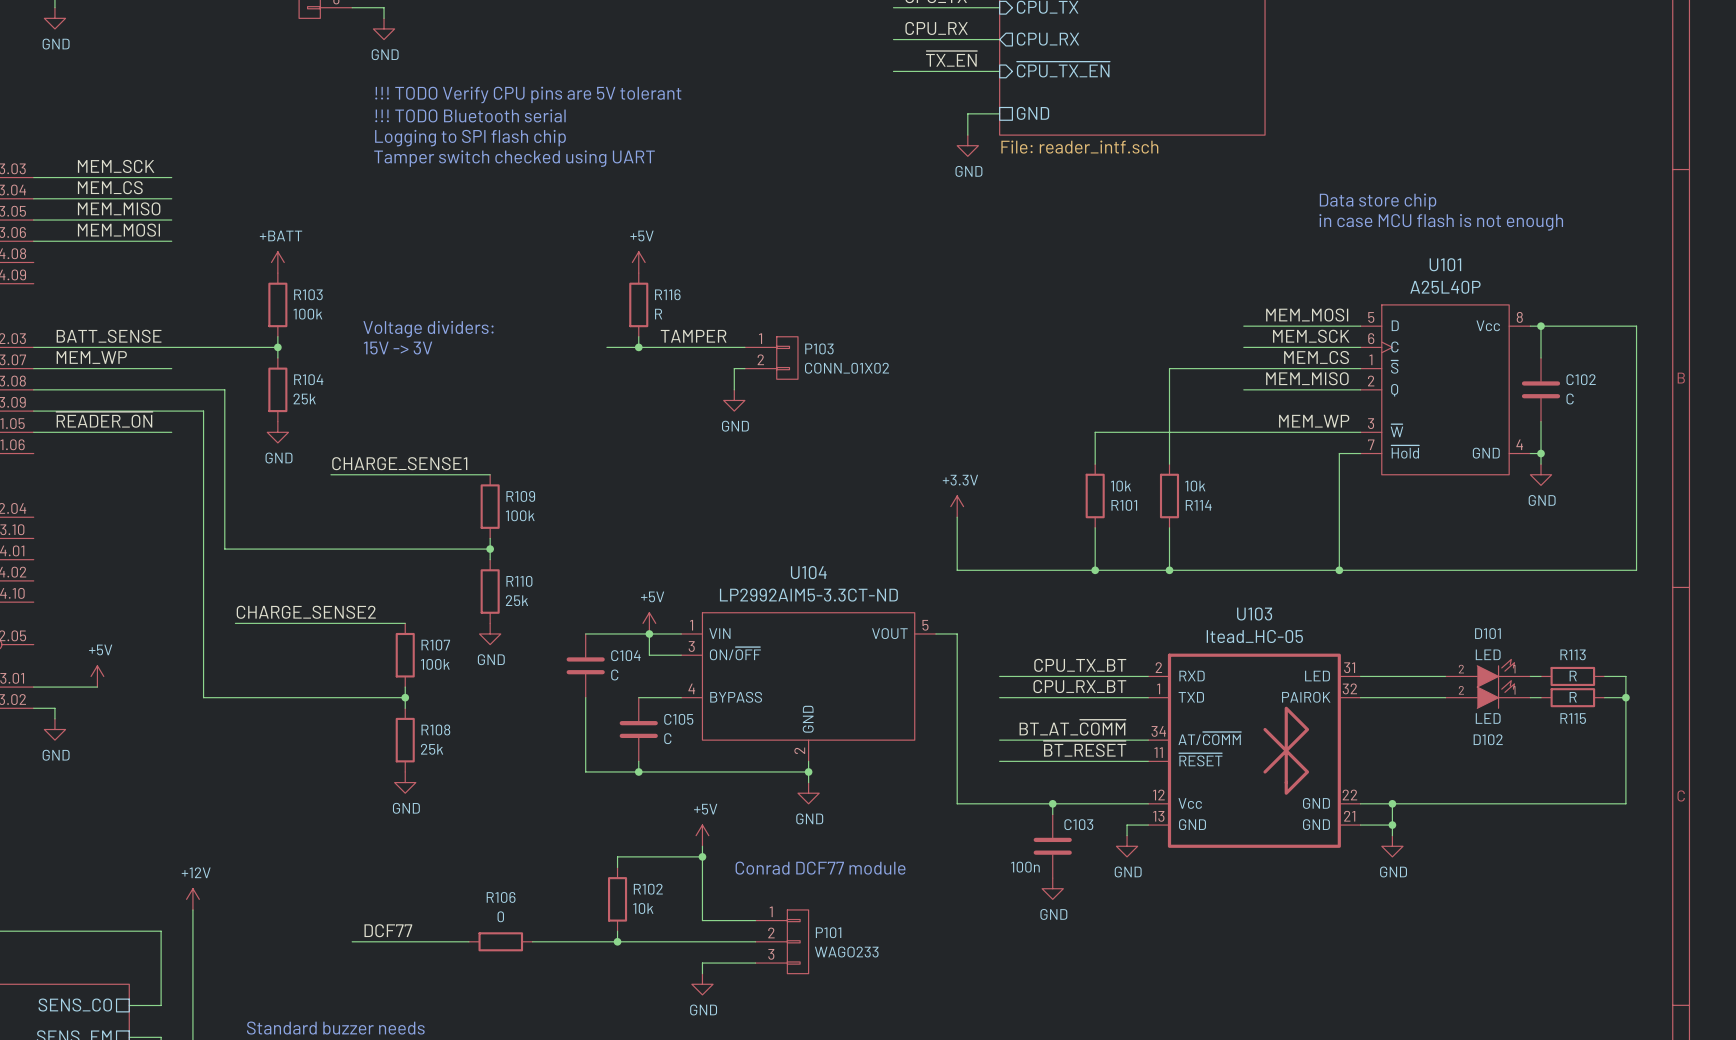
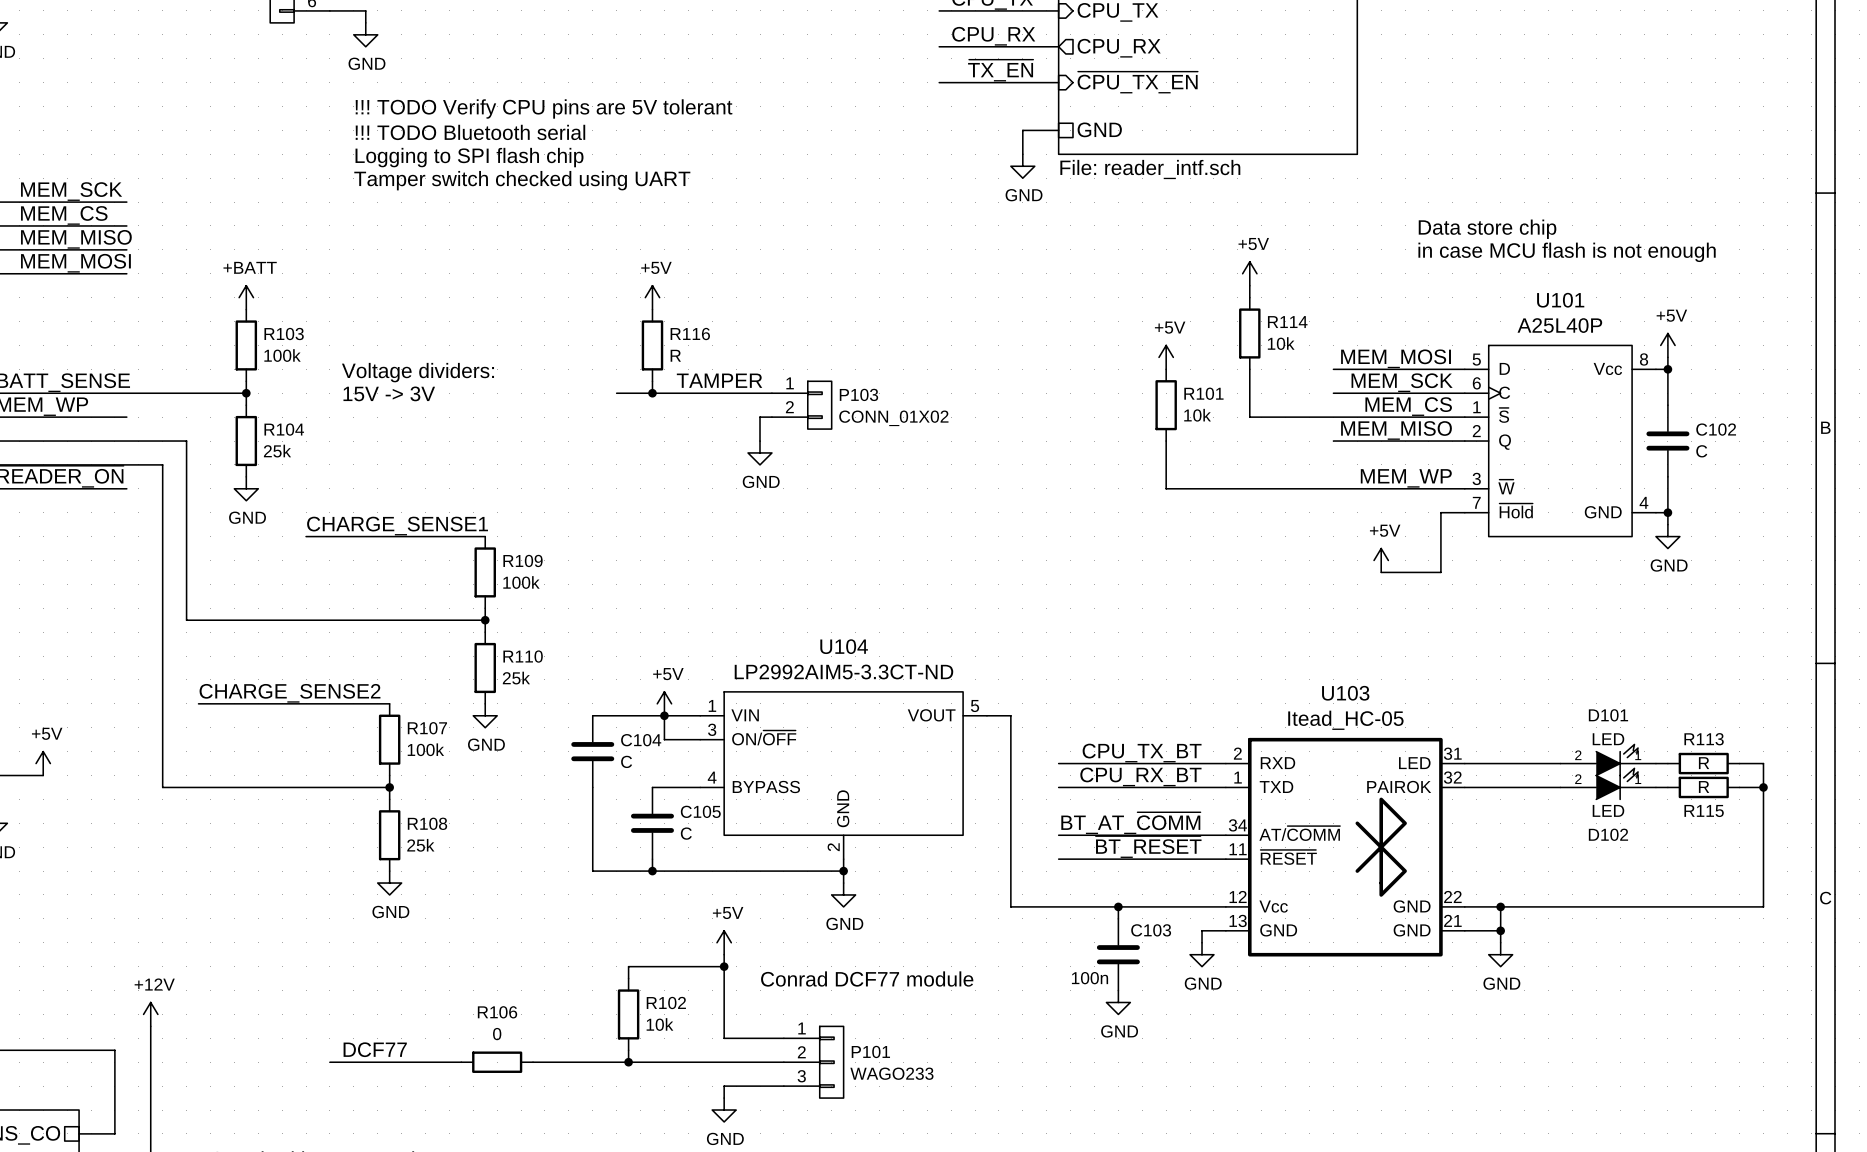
power symbol: none -> +5V (1249, 273)
wire: none -> (1249, 285) (1249, 297)
power symbol: none -> +5V (1667, 345)
power symbol: none -> +5V (1166, 357)
wire: (1541, 326) (1636, 326) (1636, 570) (957, 570) (957, 517) -> (1667, 369) (1667, 357)
wire: (1169, 368) (1169, 464) -> (1249, 417) (1249, 369)
wire: (1095, 432) (1095, 464) -> (1166, 488) (1166, 441)
R101 value position: 10k (1121, 486) -> 10k (1197, 415)
R114 value position: 10k (1195, 486) -> 10k (1281, 343)
R101 position: (1095, 495) -> (1166, 405)
R114 position: (1169, 495) -> (1249, 333)
power symbol: none -> +5V (1381, 560)
R101 name position: R101 (1124, 505) -> R101 (1203, 393)
R114 name position: R114 (1198, 505) -> R114 (1287, 322)
power symbol: +3.3V (957, 506) -> none
wire: (1339, 506) (1339, 570) -> (1440, 572) (1381, 572)
wire: (1095, 527) (1095, 570) -> none
wire: (1169, 527) (1169, 570) -> none
junction: (1095, 570) -> none
junction: (1169, 570) -> none
junction: (1339, 570) -> none

